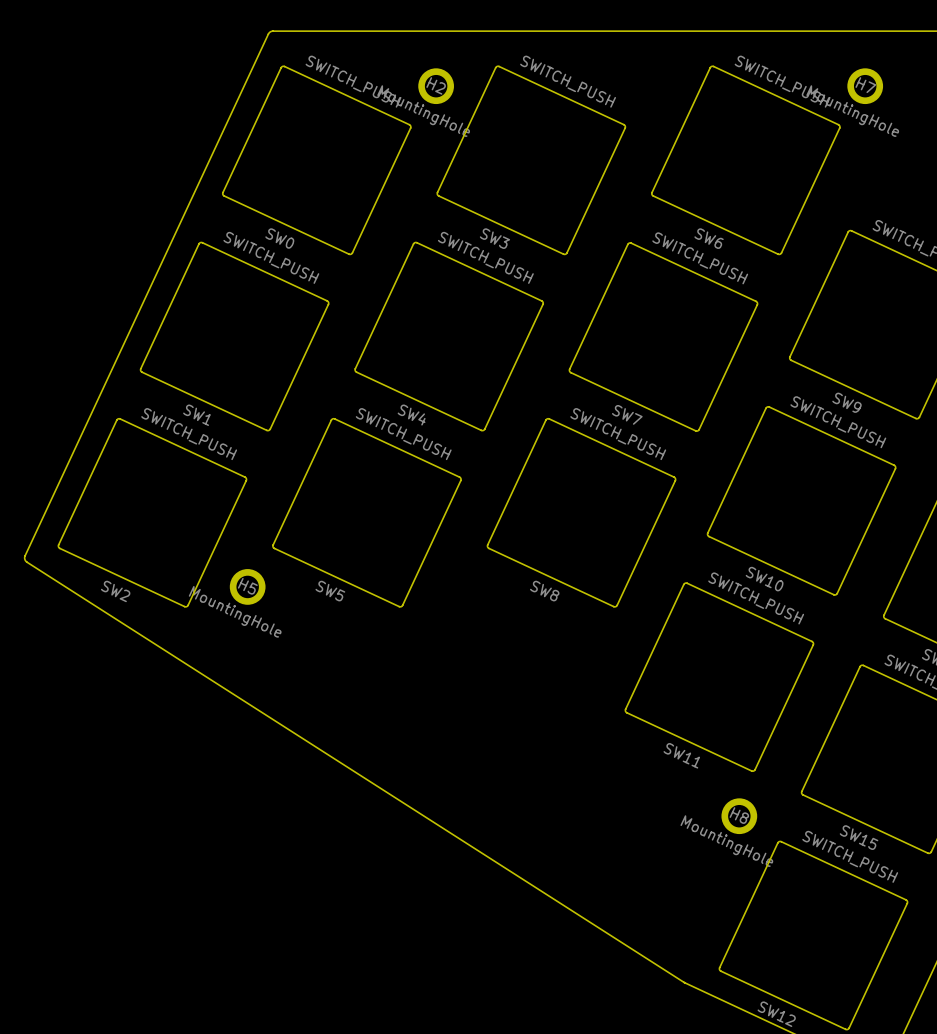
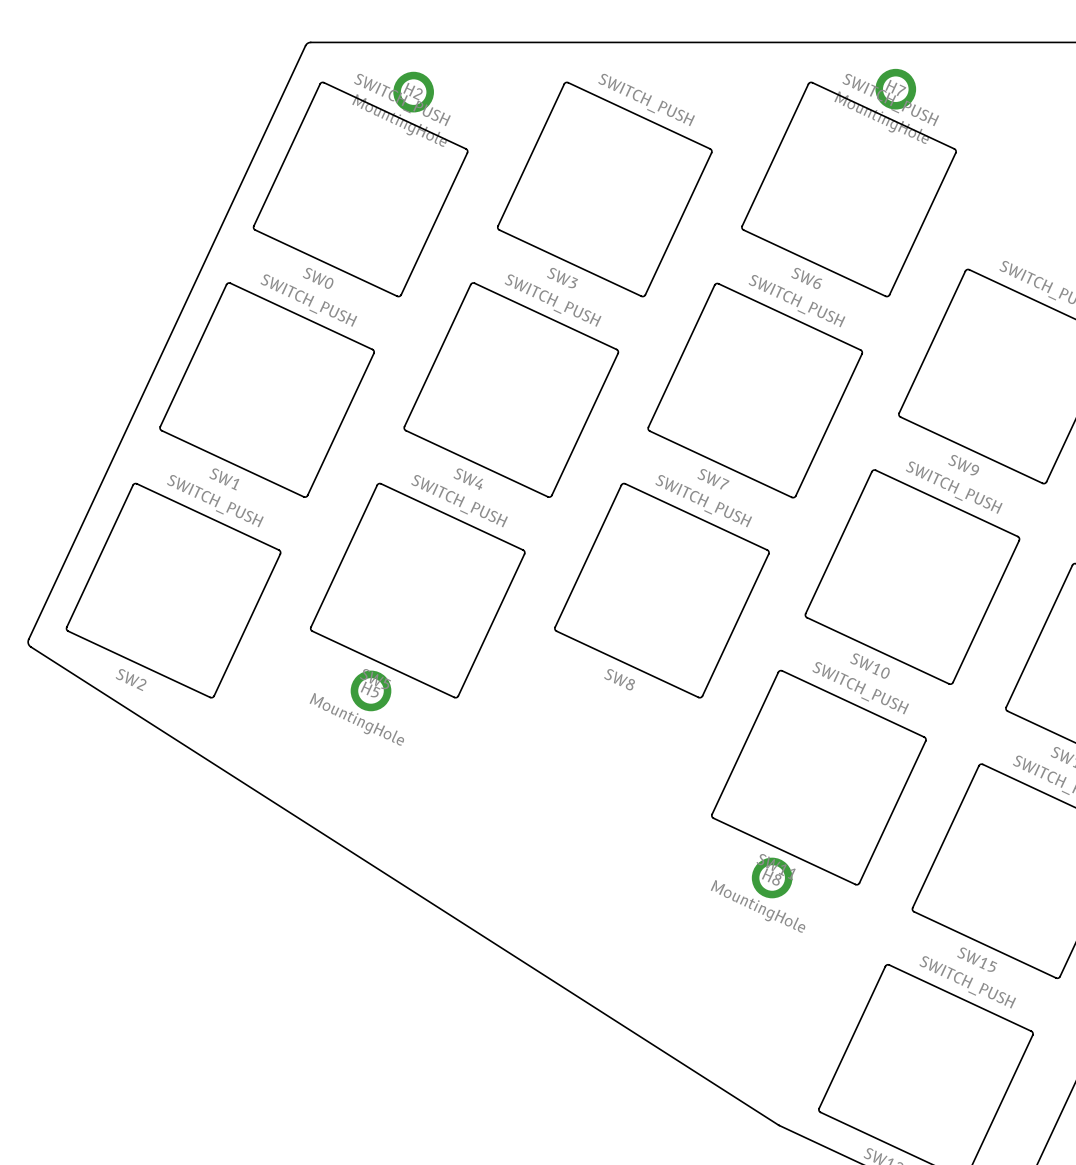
H2 position: (436, 86) -> (413, 92)
H7 position: (865, 86) -> (895, 89)
H5 position: (247, 586) -> (371, 690)
H8 position: (739, 816) -> (772, 877)

